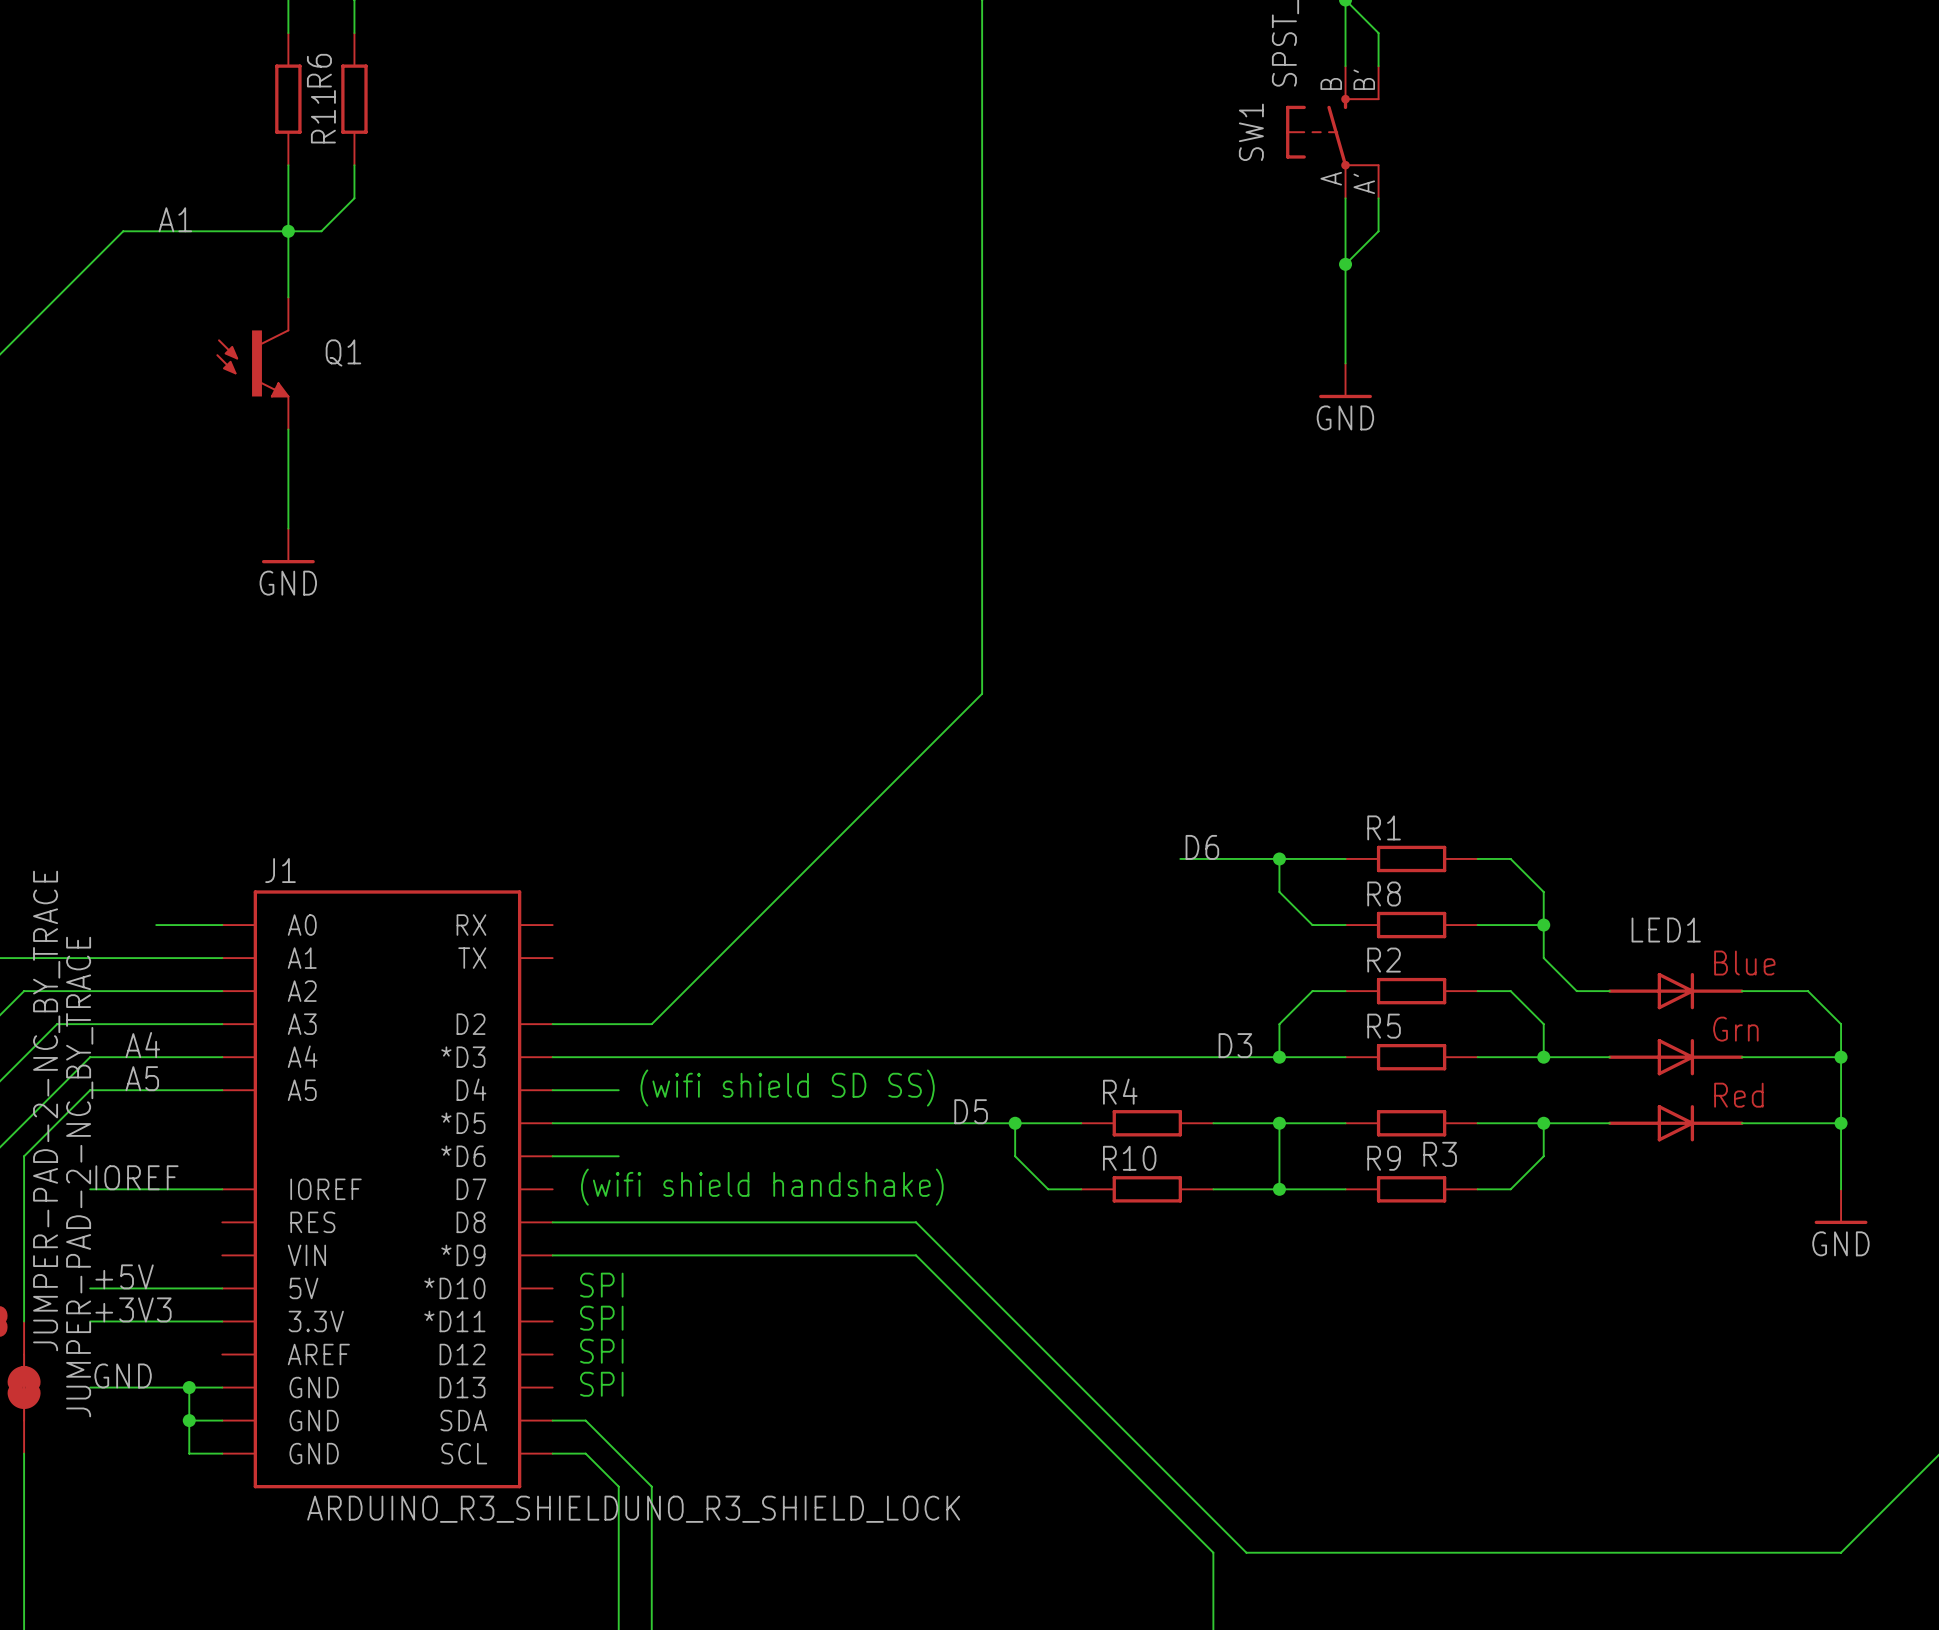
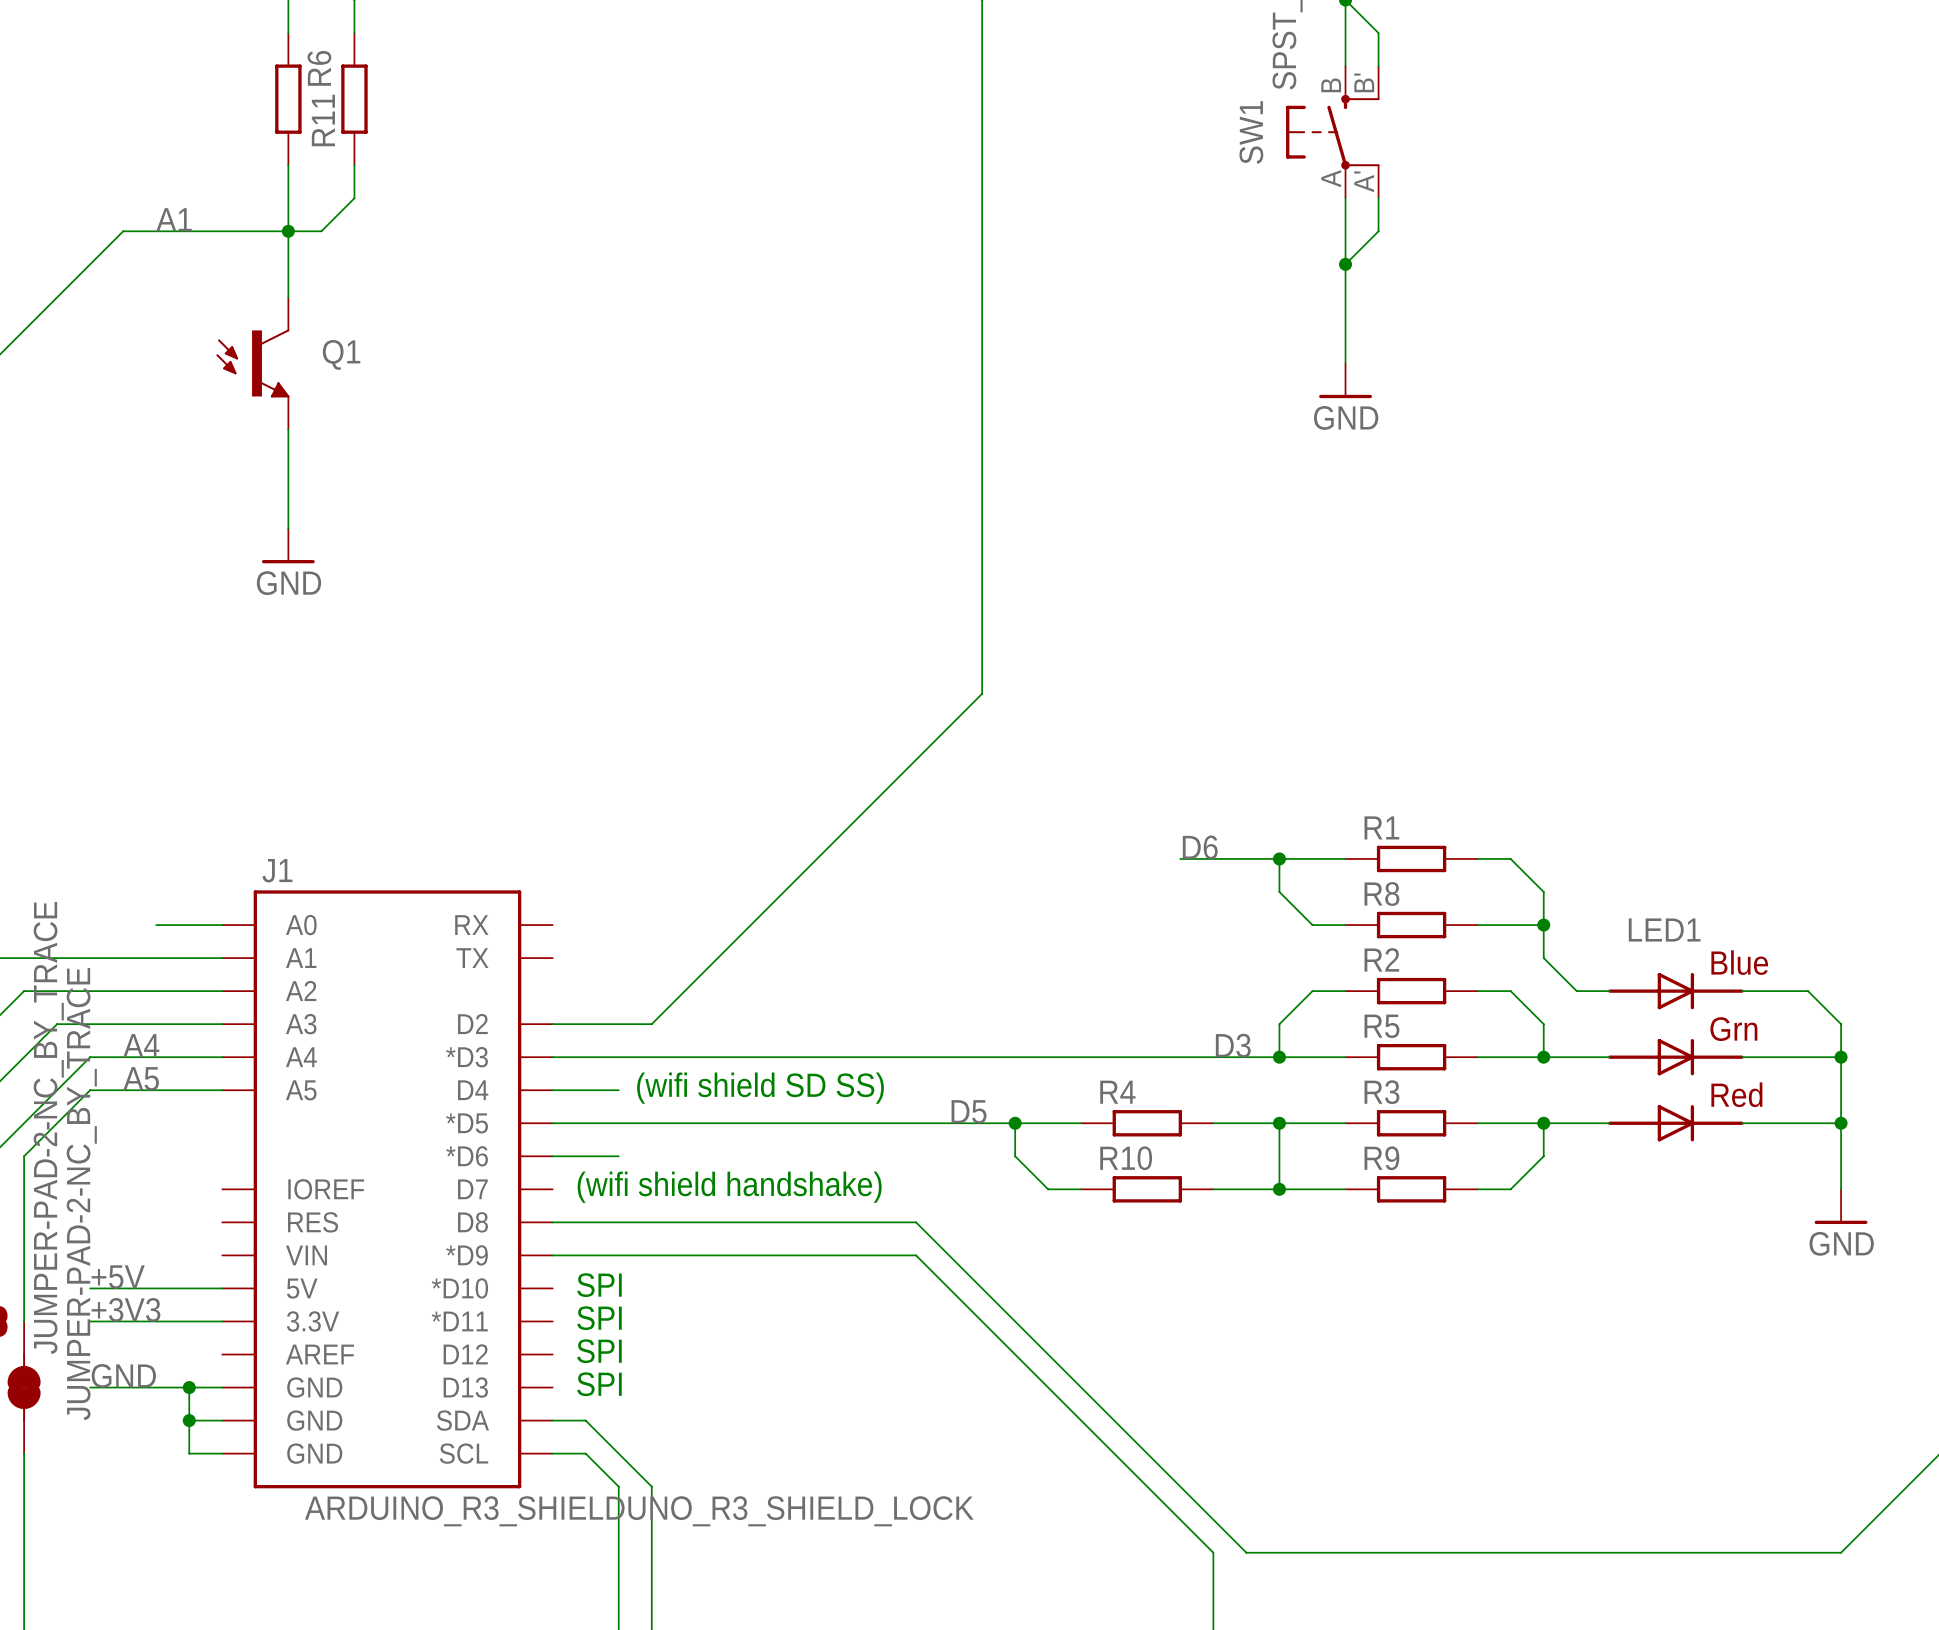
R3 name position: R3 (1440, 1154) -> R3 (1381, 1092)
label: IOREF (136, 1177) -> none
wire: (90, 1189) (222, 1189) -> none

